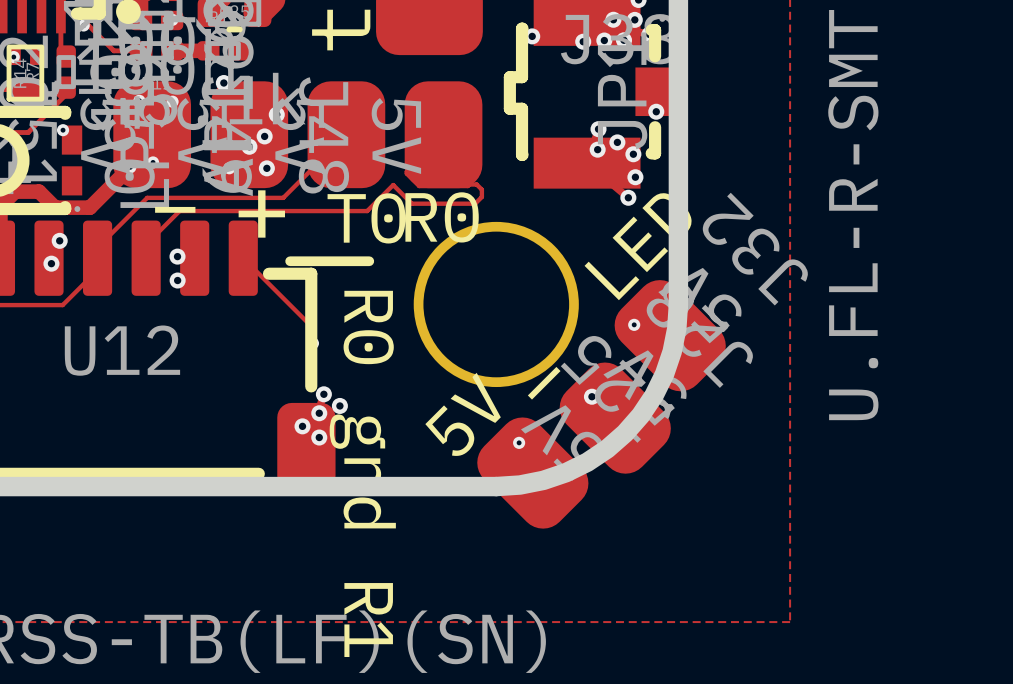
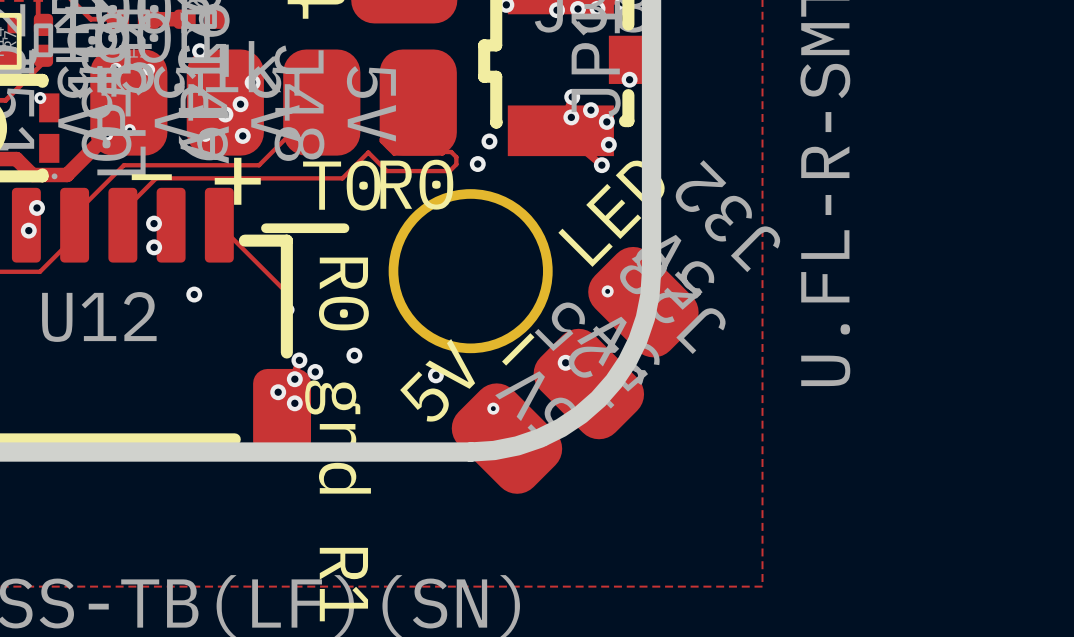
via: none -> (489, 141)
via: none -> (477, 164)
via: none -> (194, 294)
via: none -> (354, 355)
via: none -> (435, 375)

